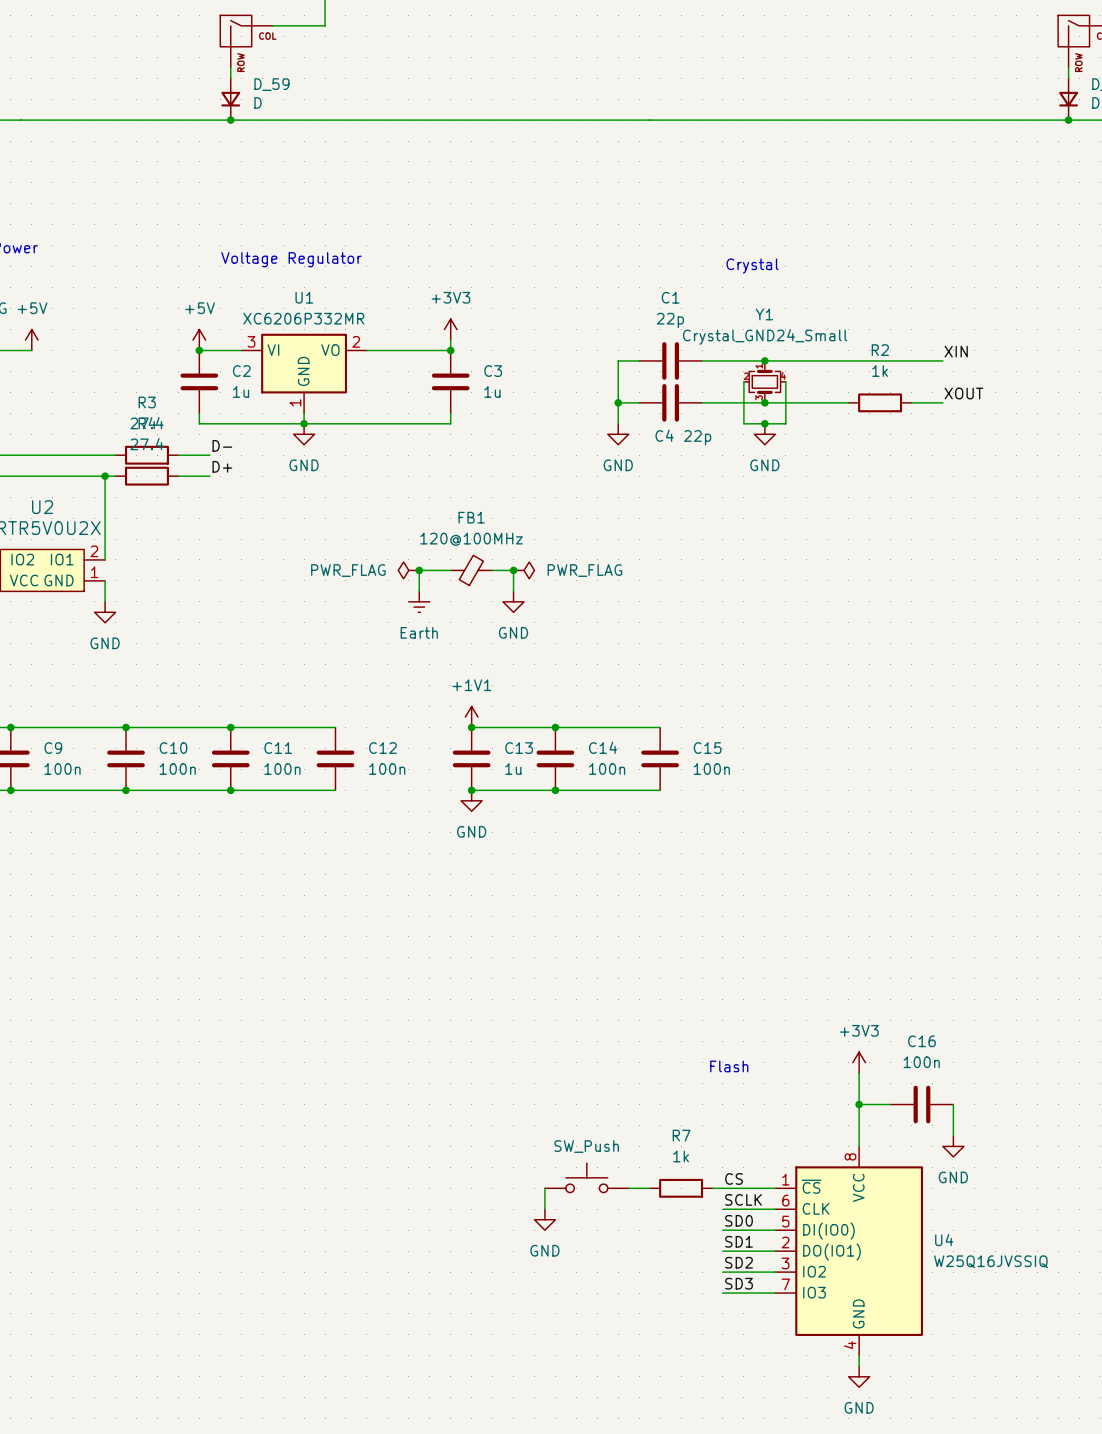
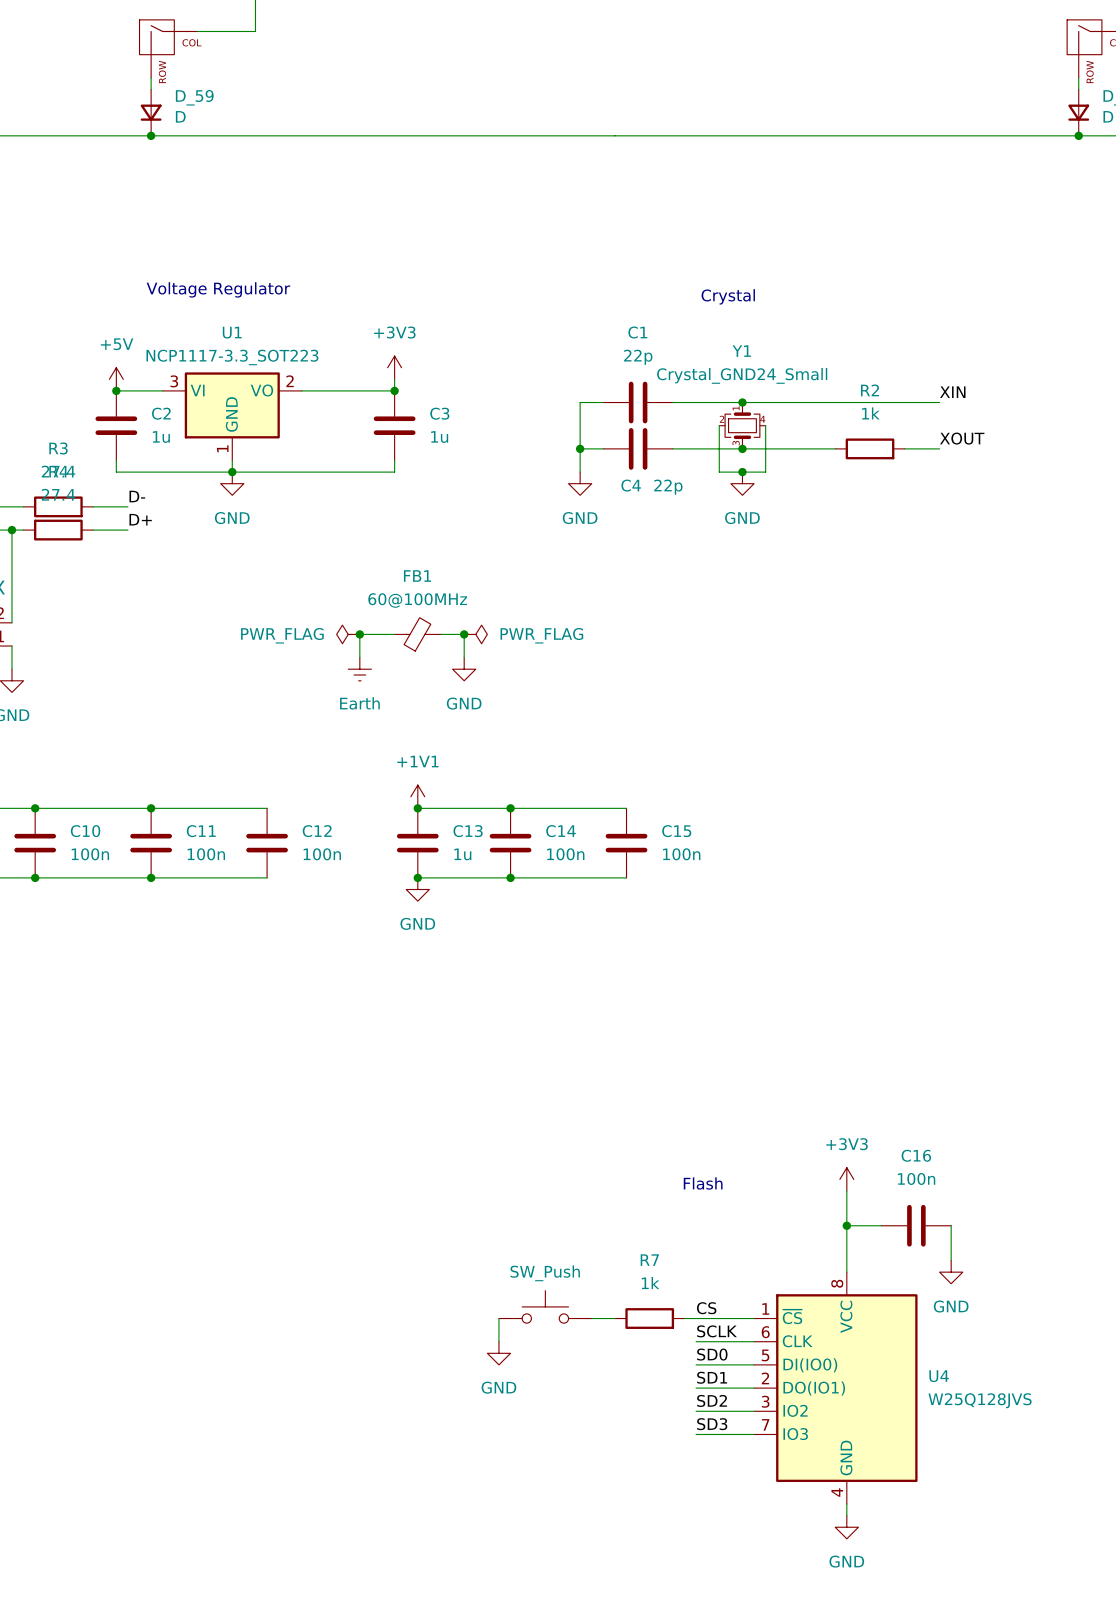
U1 value: XC6206P332MR (303, 318) -> NCP1117-3.3_SOT223 (232, 357)
FB1 value: 120@100MHz (471, 539) -> 60@100MHz (417, 600)
U4 value: W25Q16JVSSIQ (991, 1261) -> W25Q128JVS (980, 1400)

